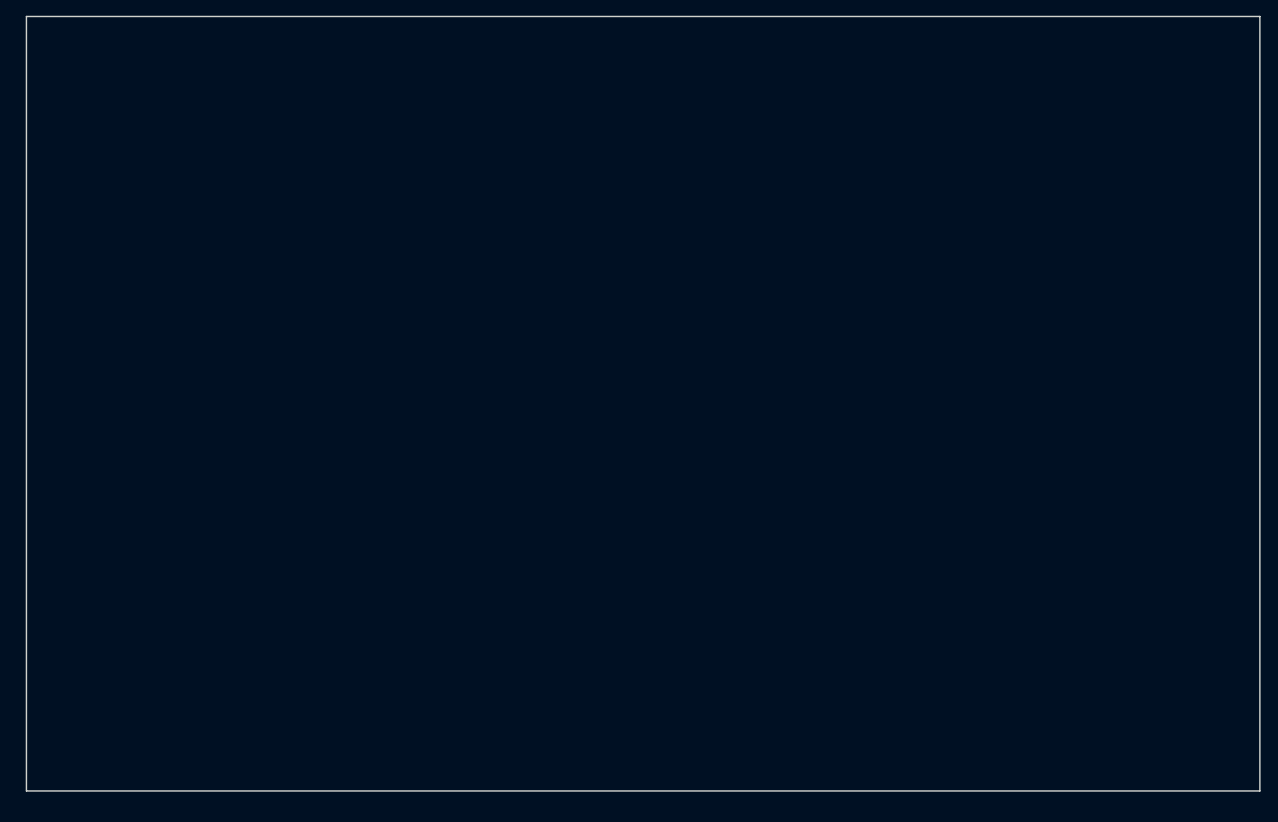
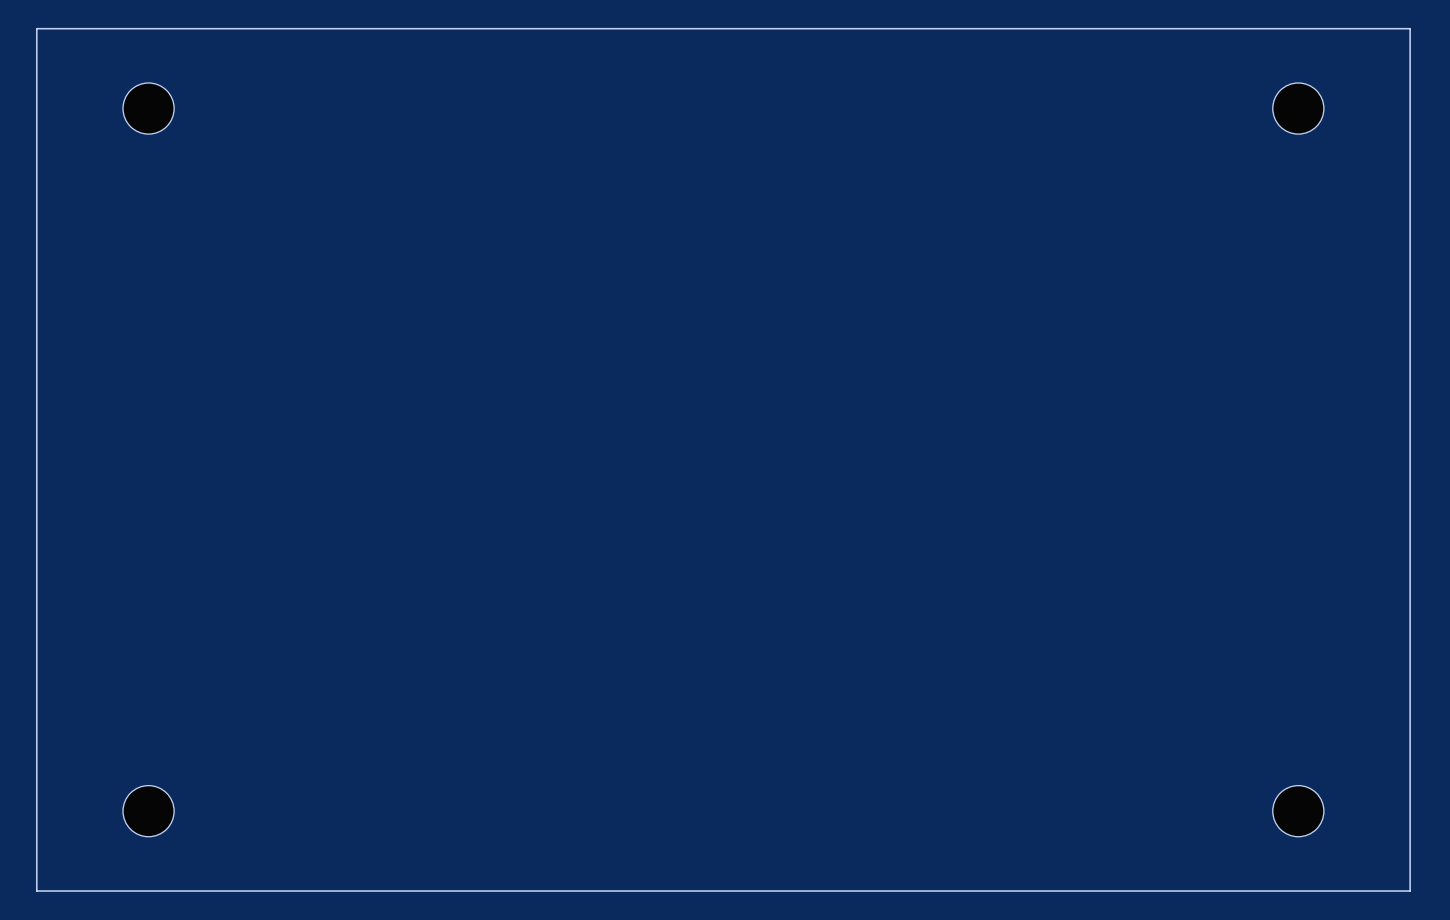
part: none -> (148, 108)
part: none -> (1298, 108)
part: none -> (148, 811)
part: none -> (1298, 811)

